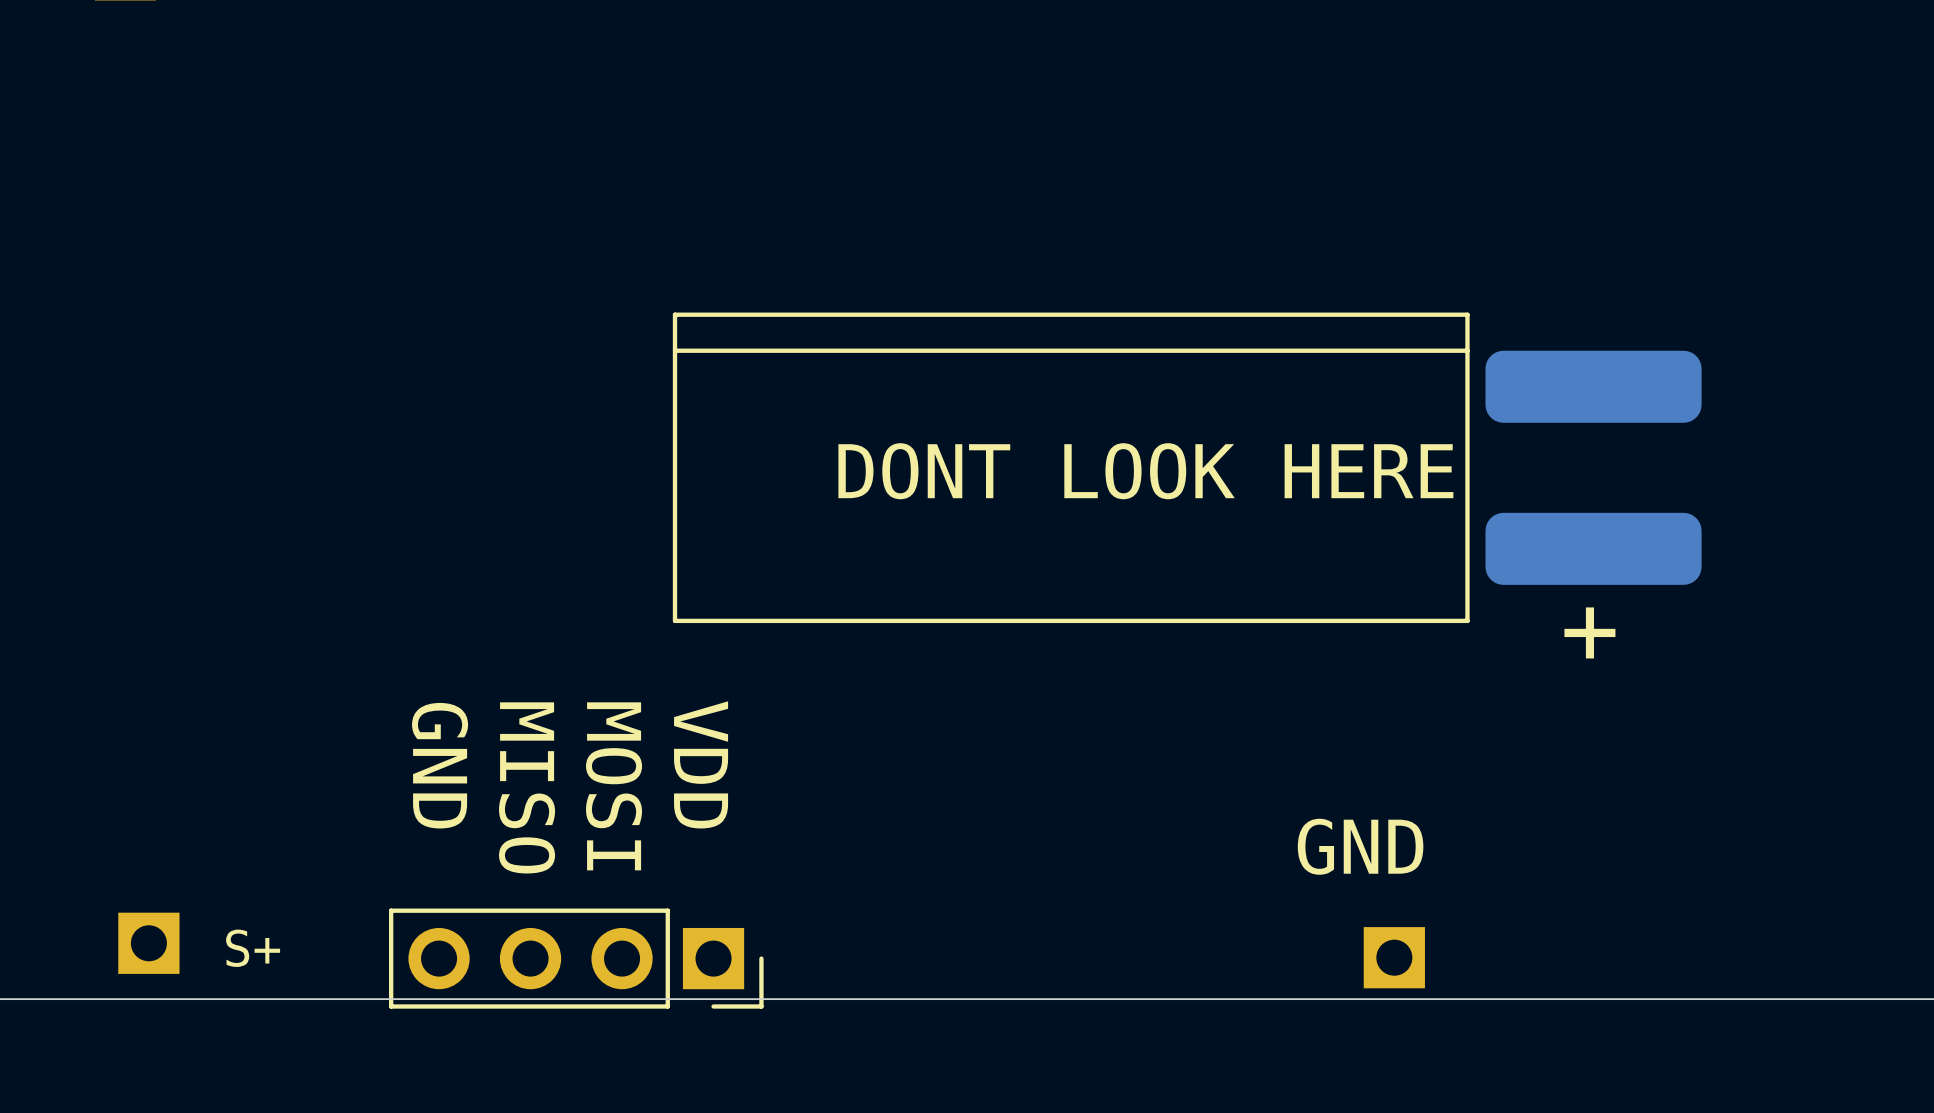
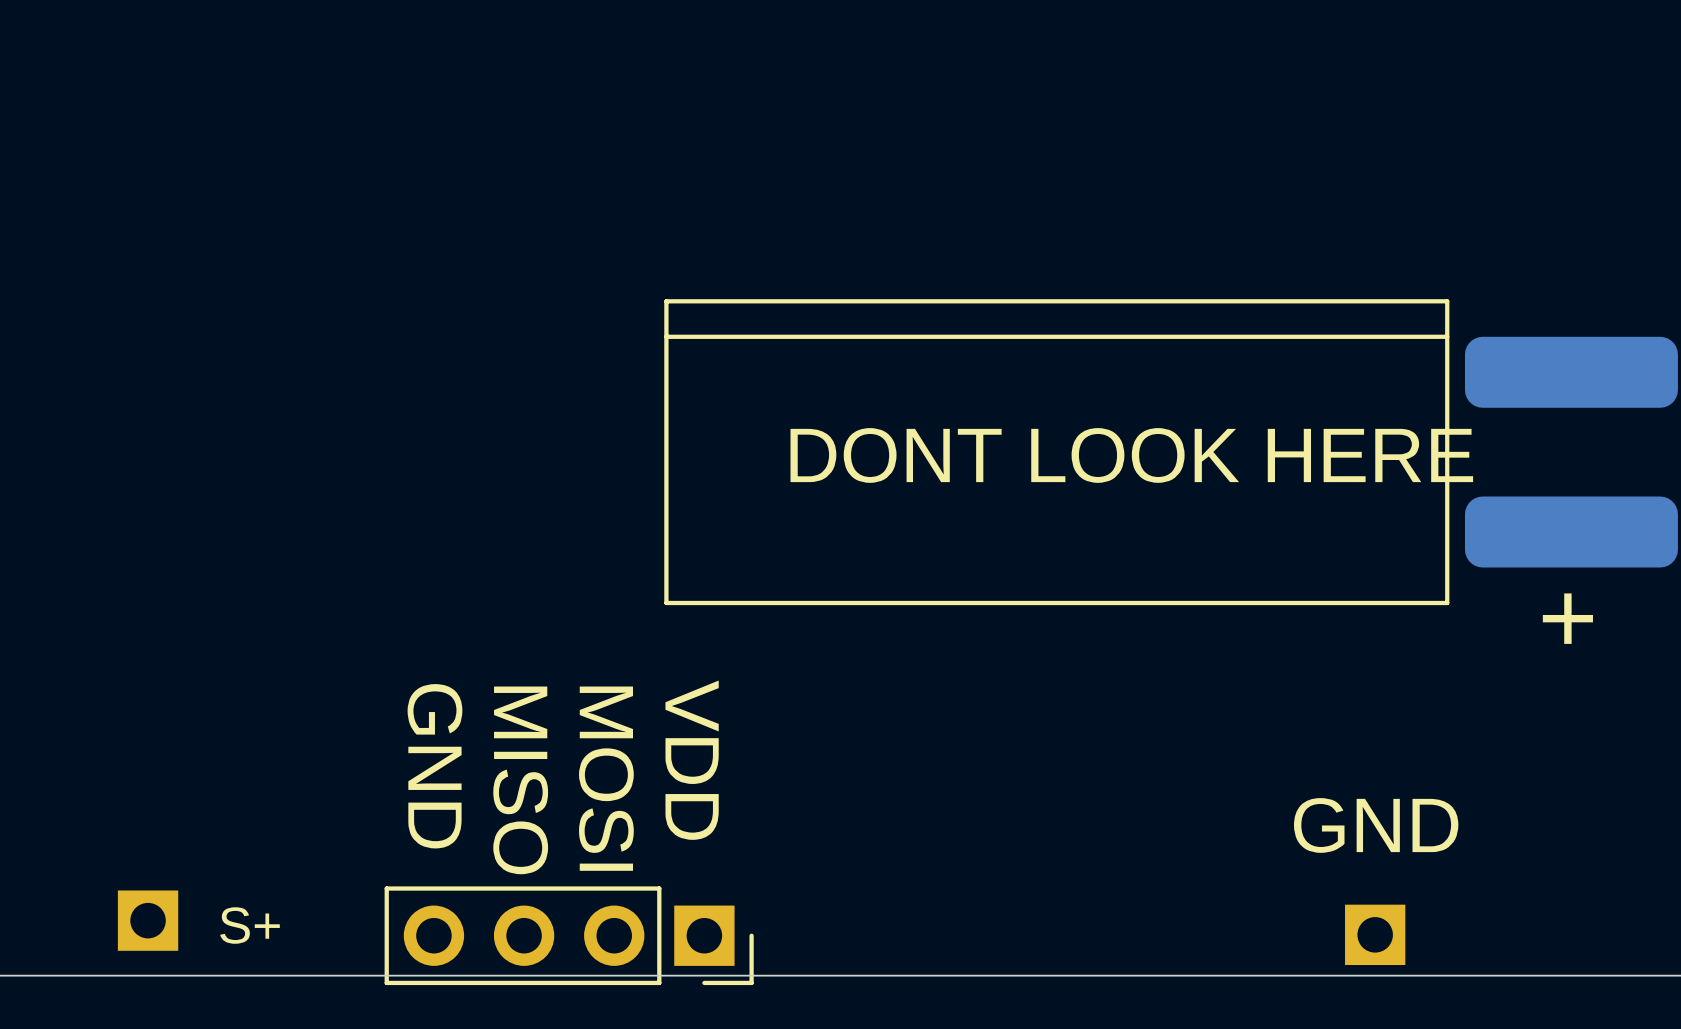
text position: GND (1360, 846) -> GND (1376, 825)

